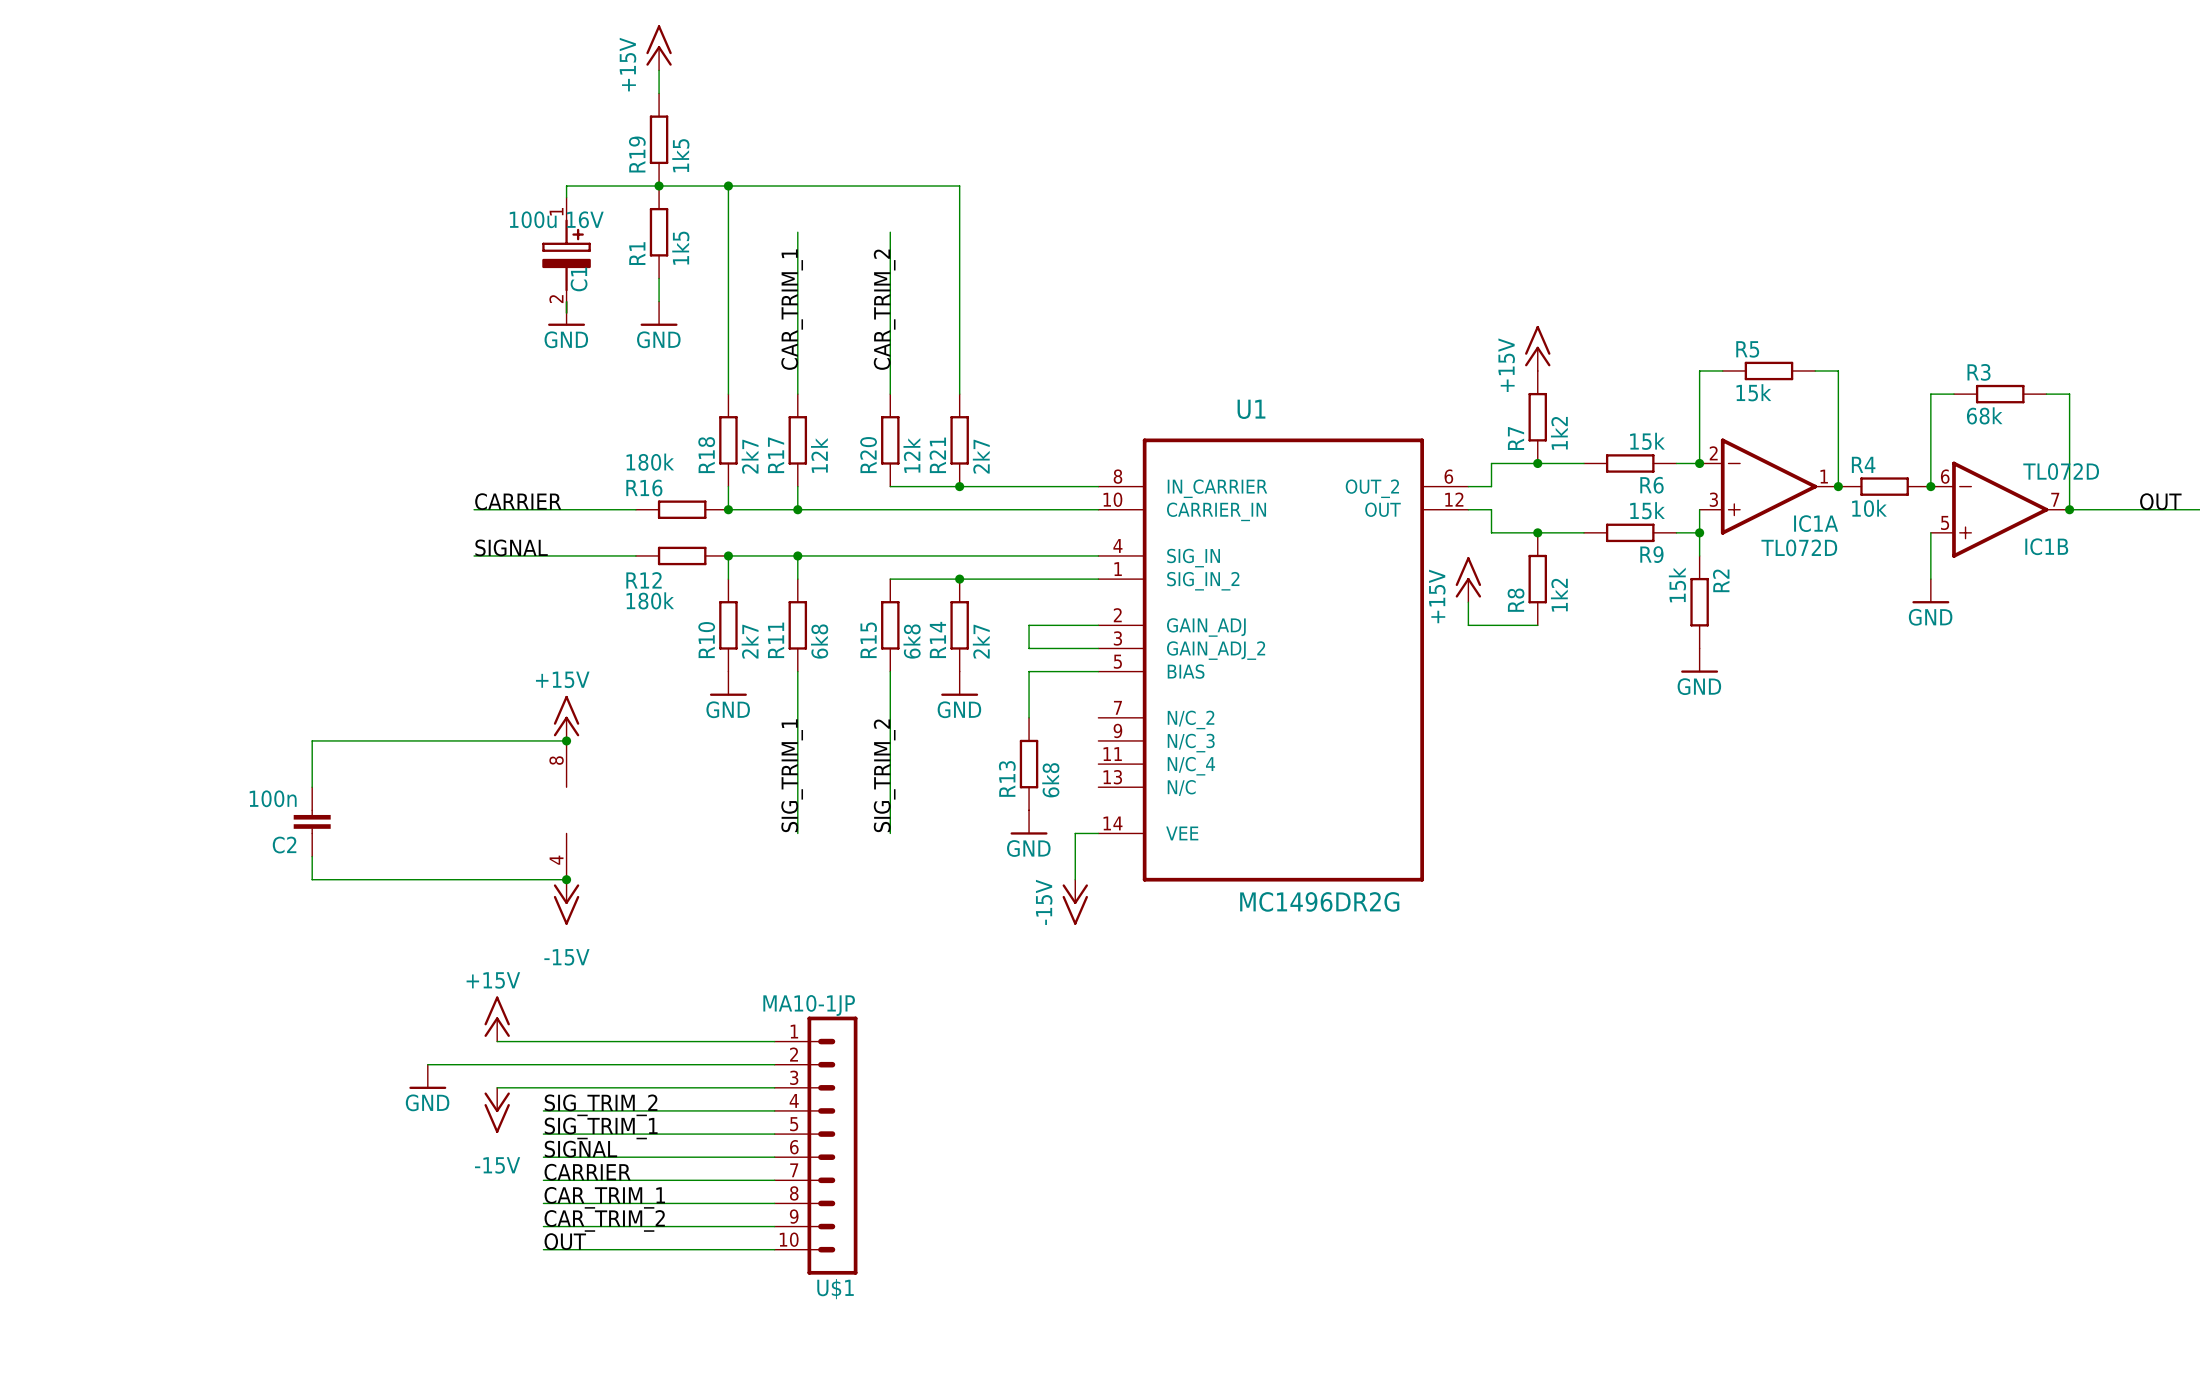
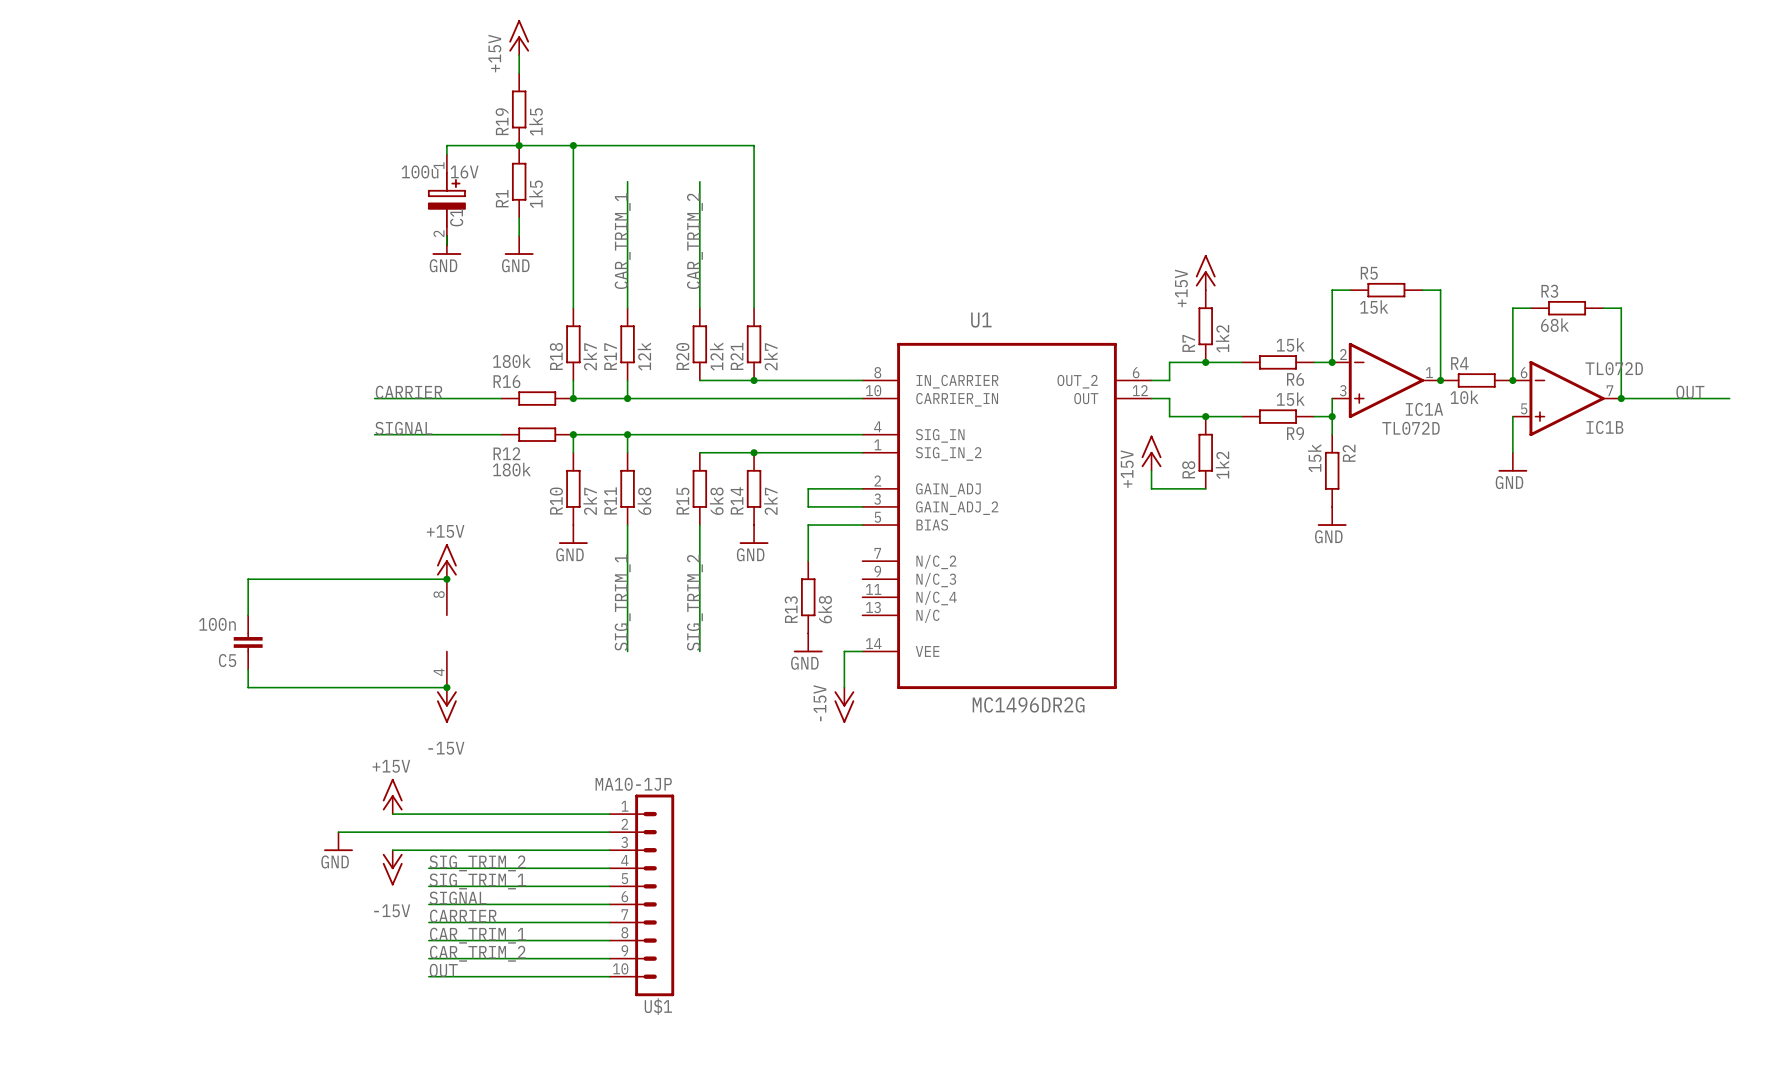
C2 name: C2 (284, 845) -> C5 (227, 660)

